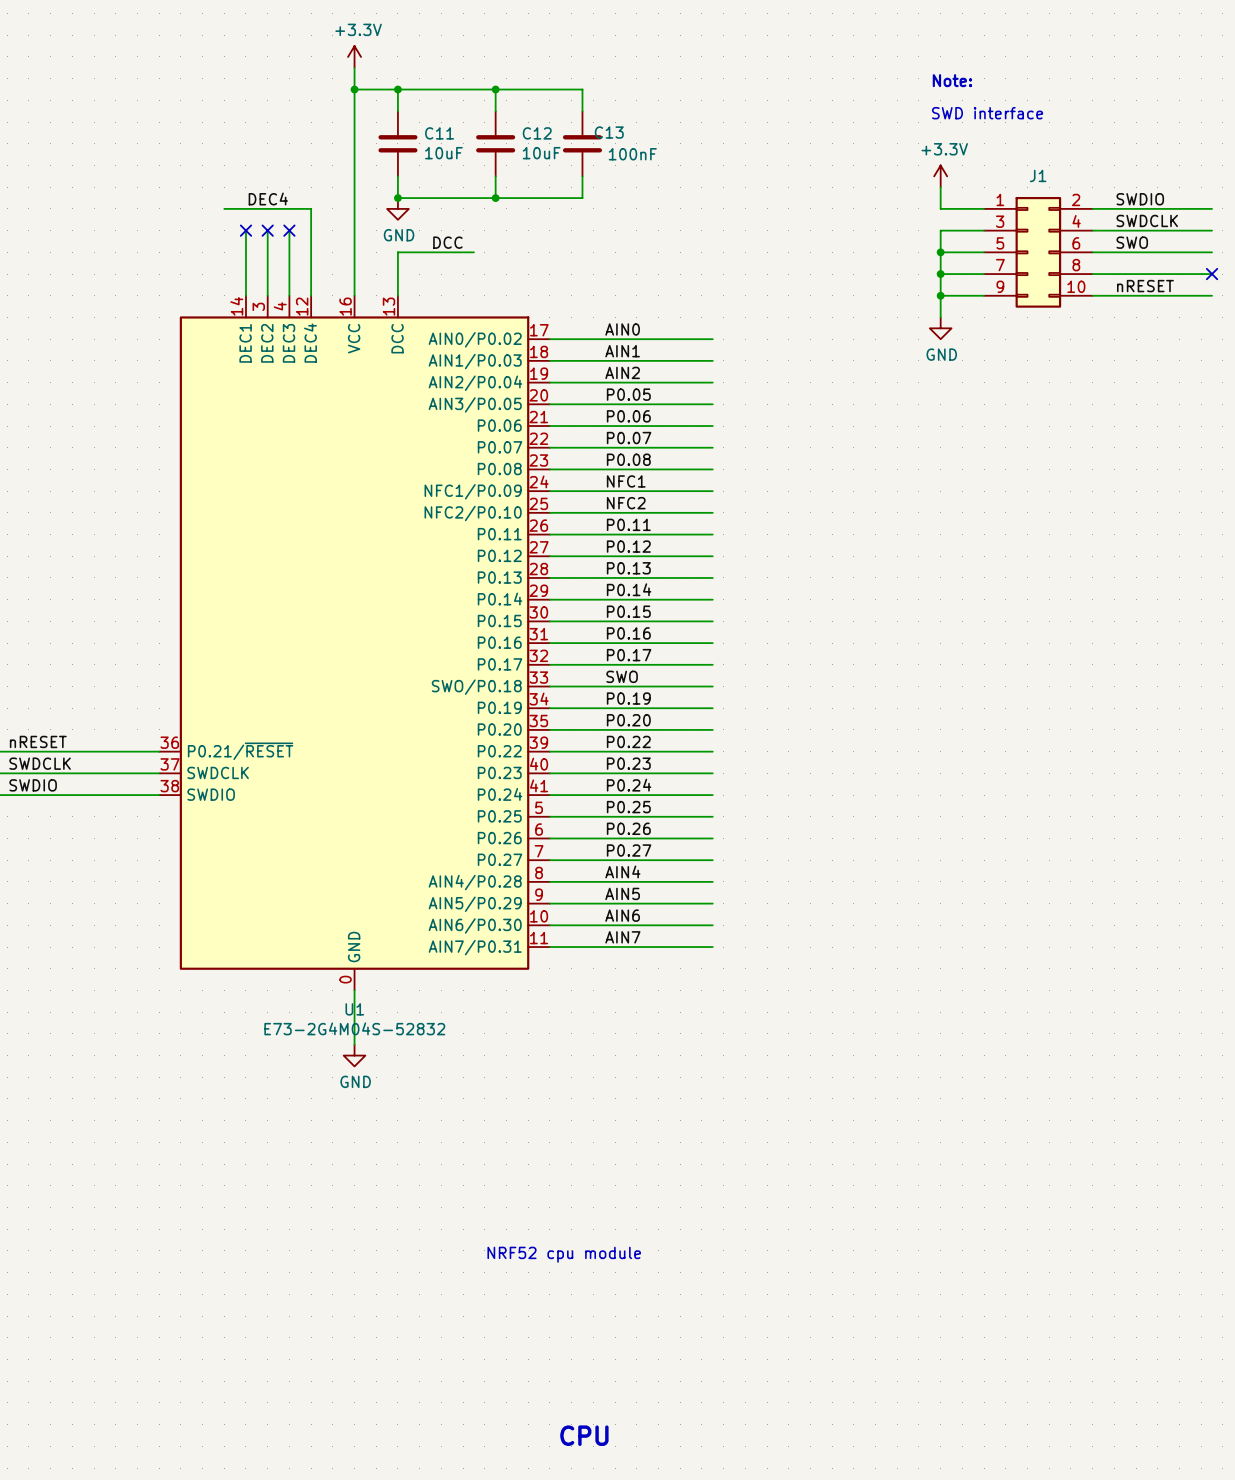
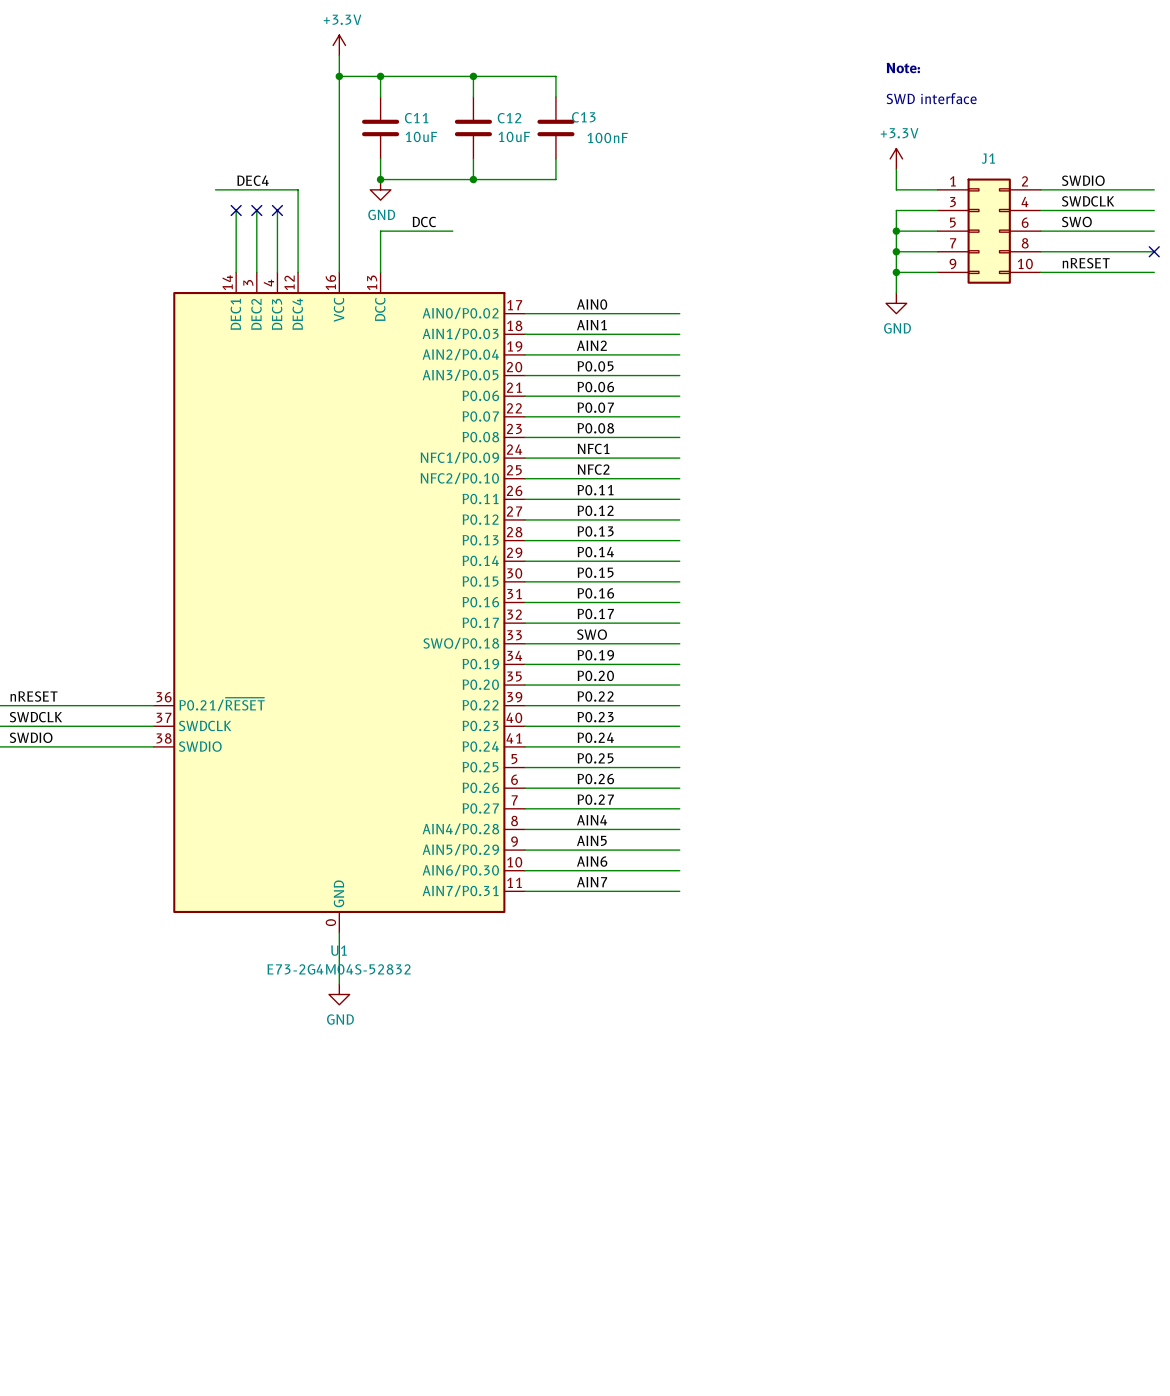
text: NRF52 cpu module (564, 1254) -> none
text: CPU (584, 1435) -> none

